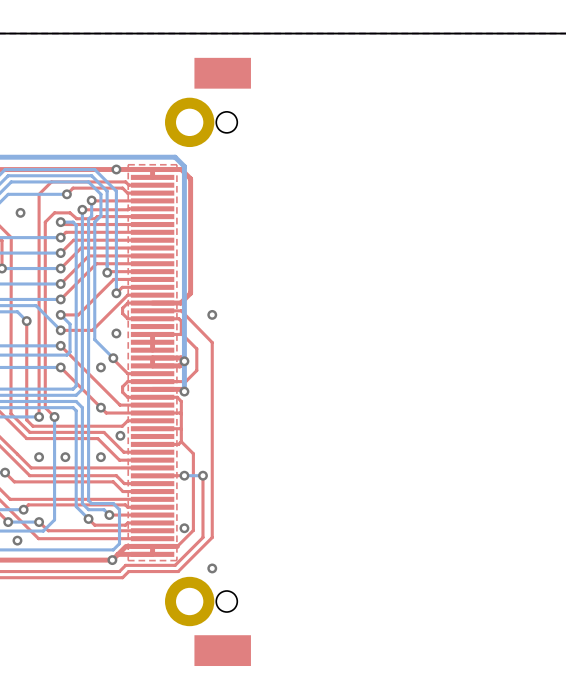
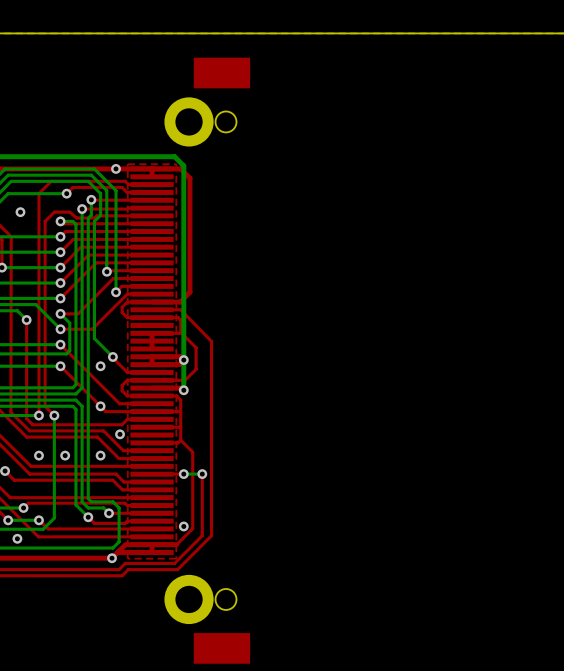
via: (212, 314) -> none
via: (116, 333) -> none
via: (212, 568) -> none

